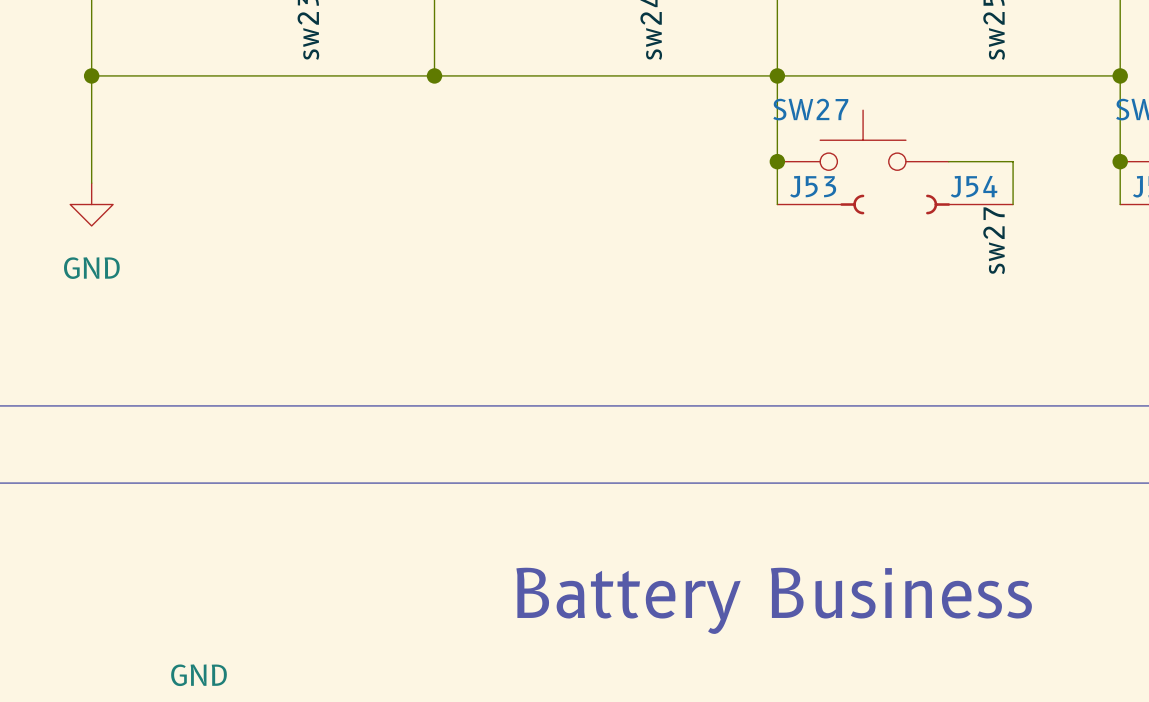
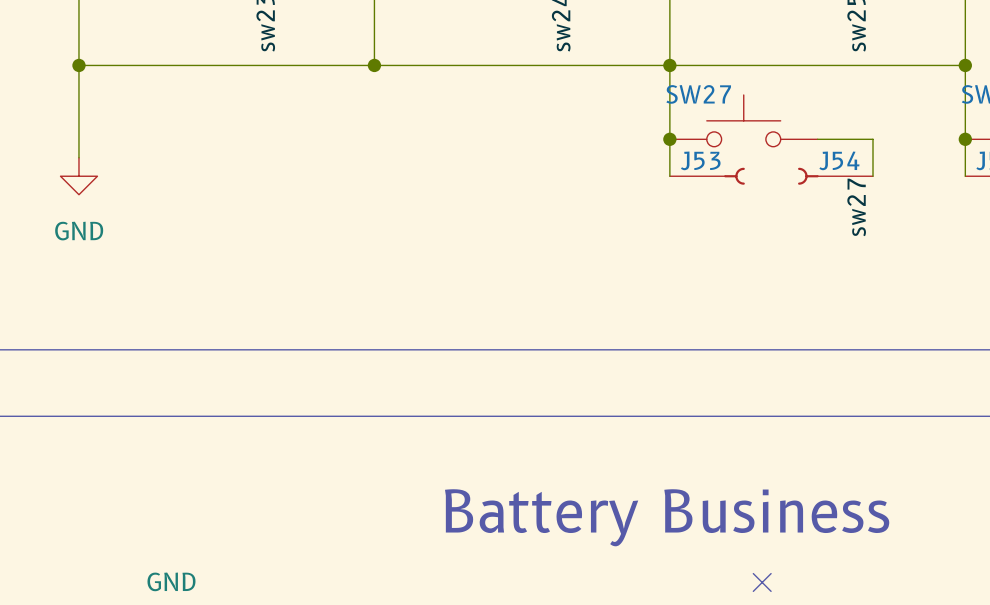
no-connect mark: none -> (762, 582)

